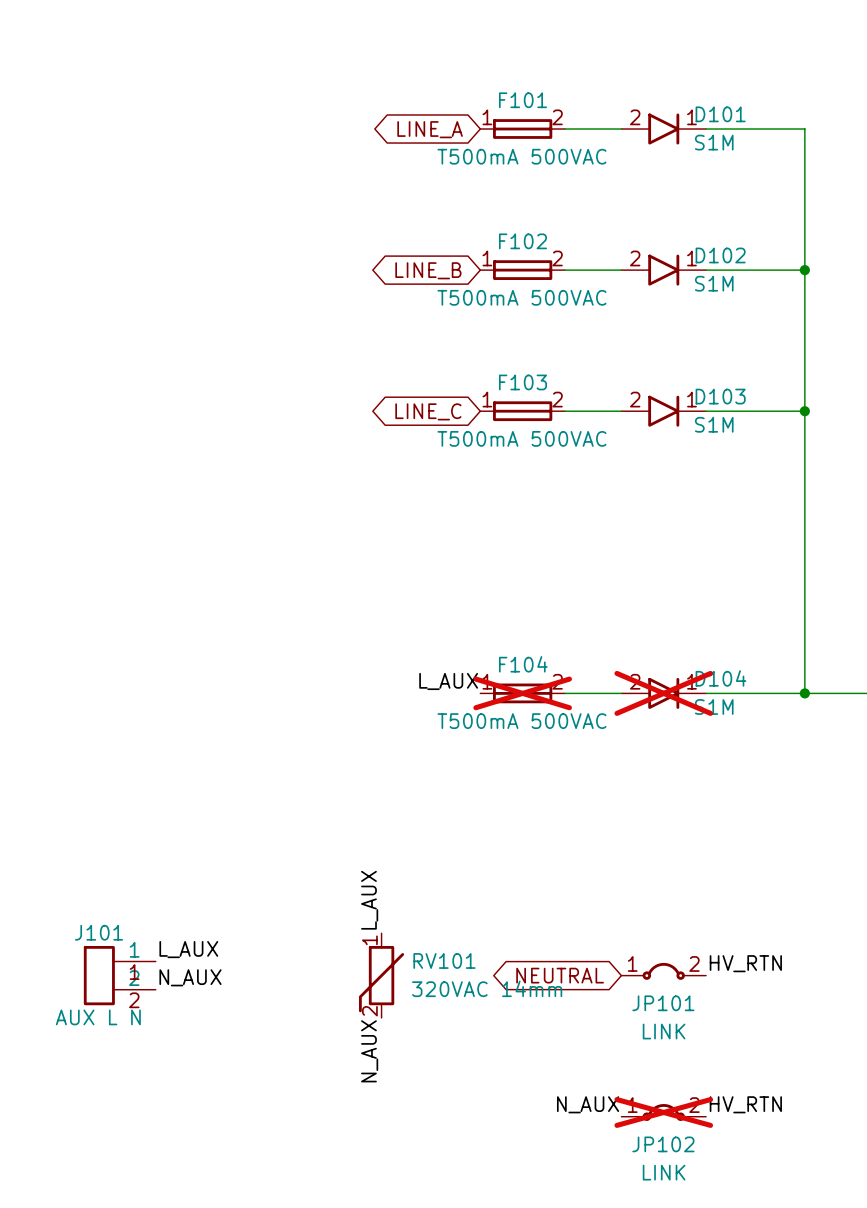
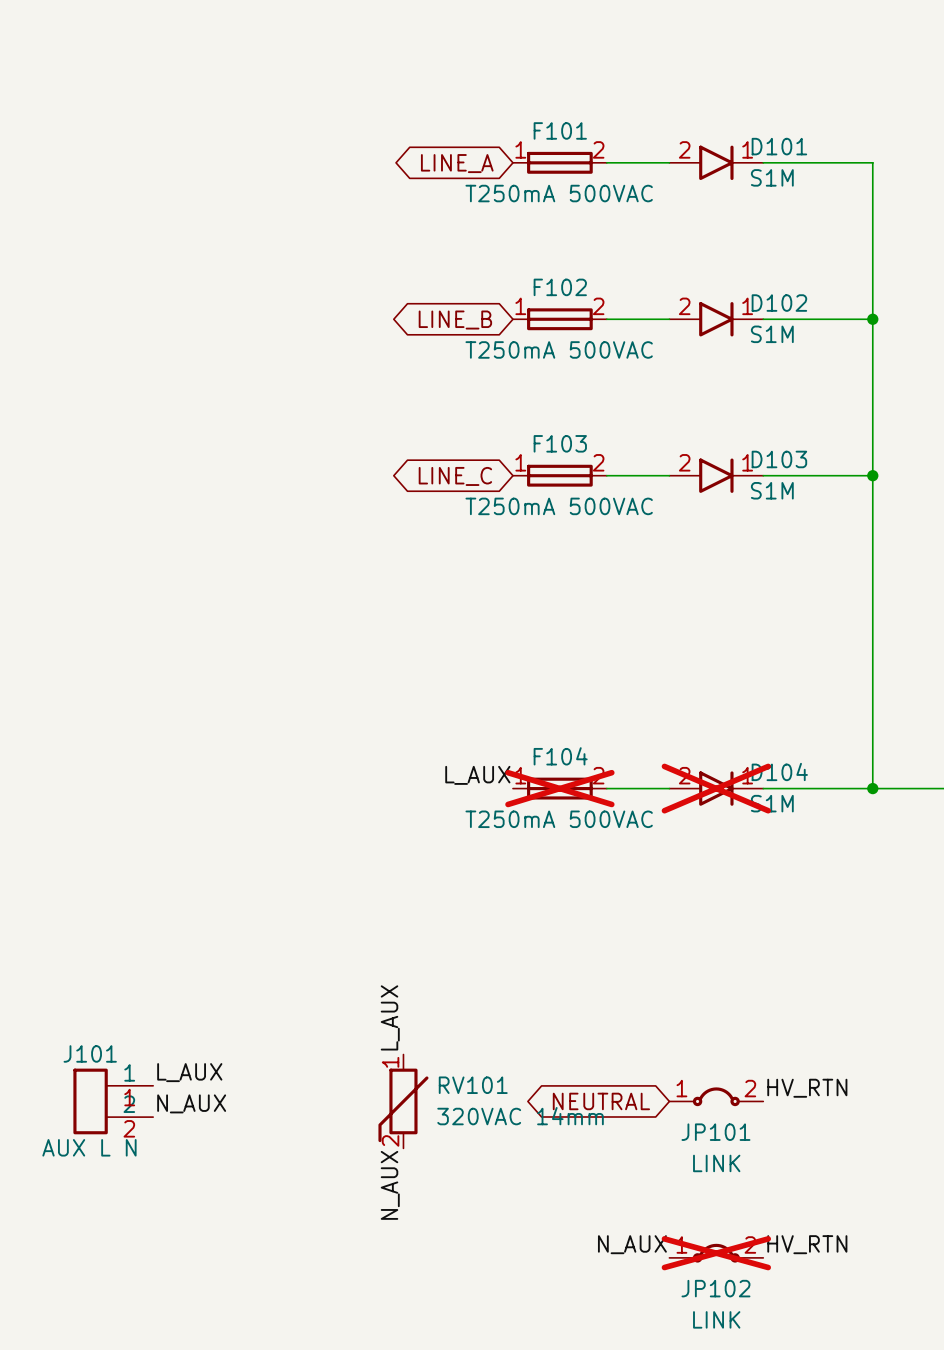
F101 value: T500mA 500VAC (521, 156) -> T250mA 500VAC (559, 193)
F102 value: T500mA 500VAC (521, 297) -> T250mA 500VAC (559, 349)
F103 value: T500mA 500VAC (521, 438) -> T250mA 500VAC (559, 506)
F104 value: T500mA 500VAC (521, 721) -> T250mA 500VAC (559, 819)

